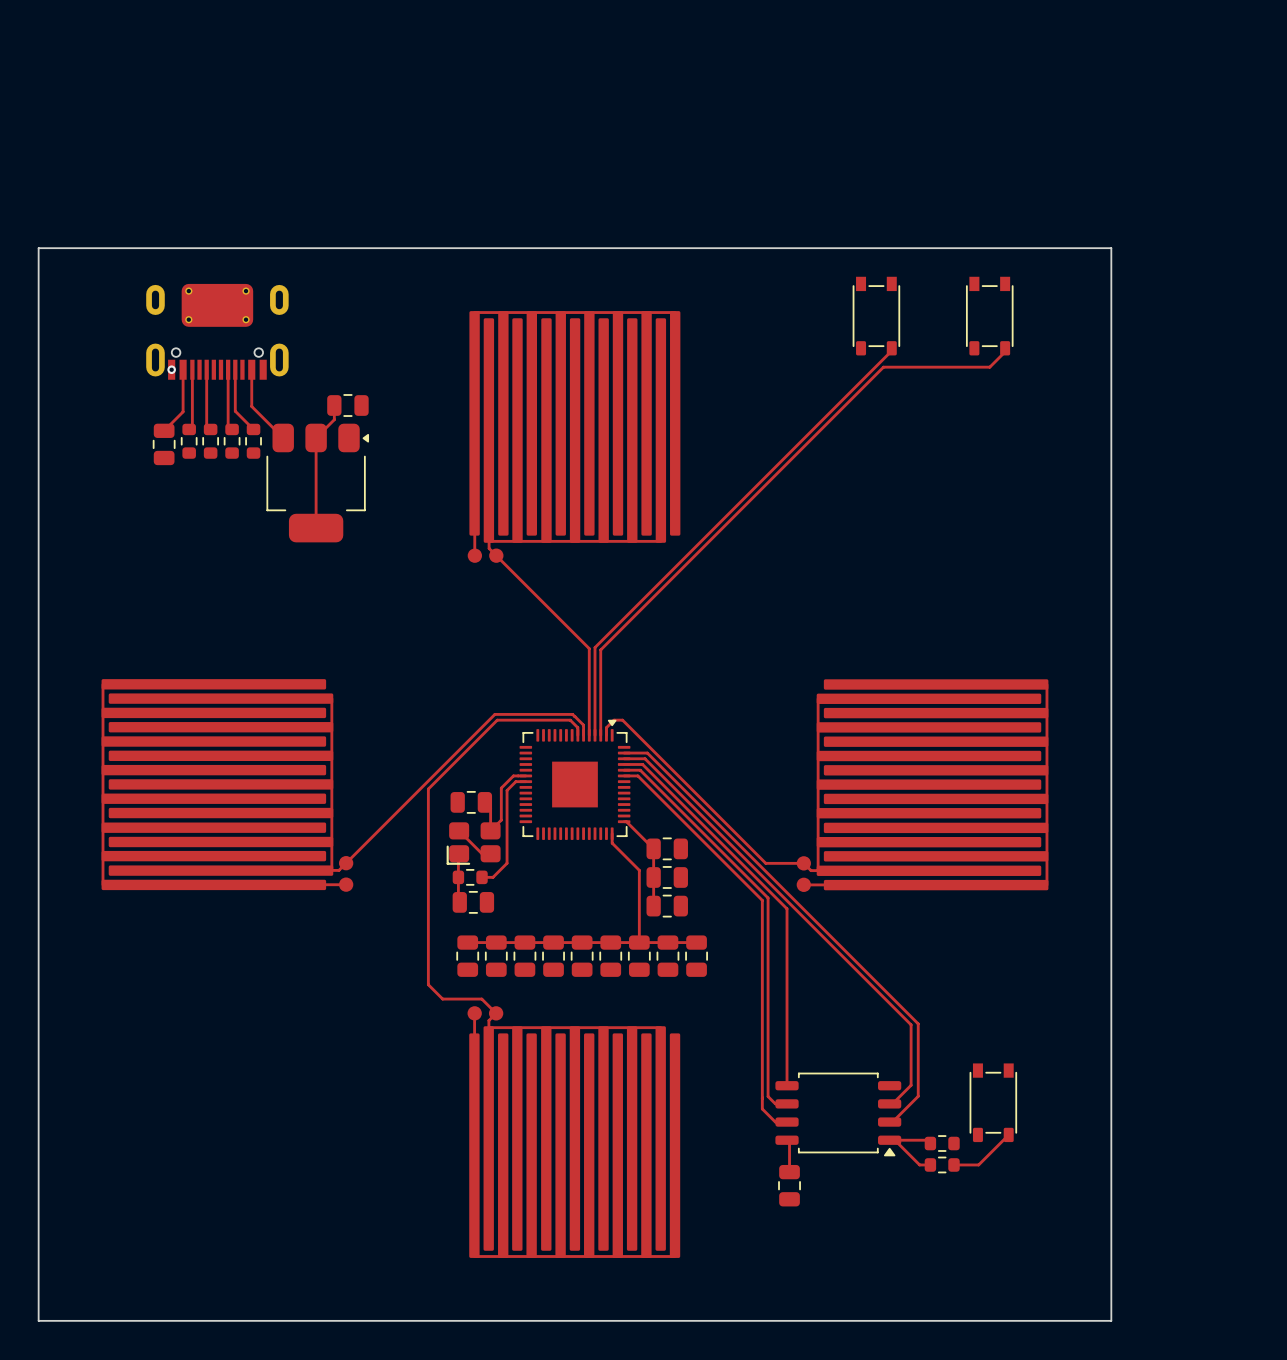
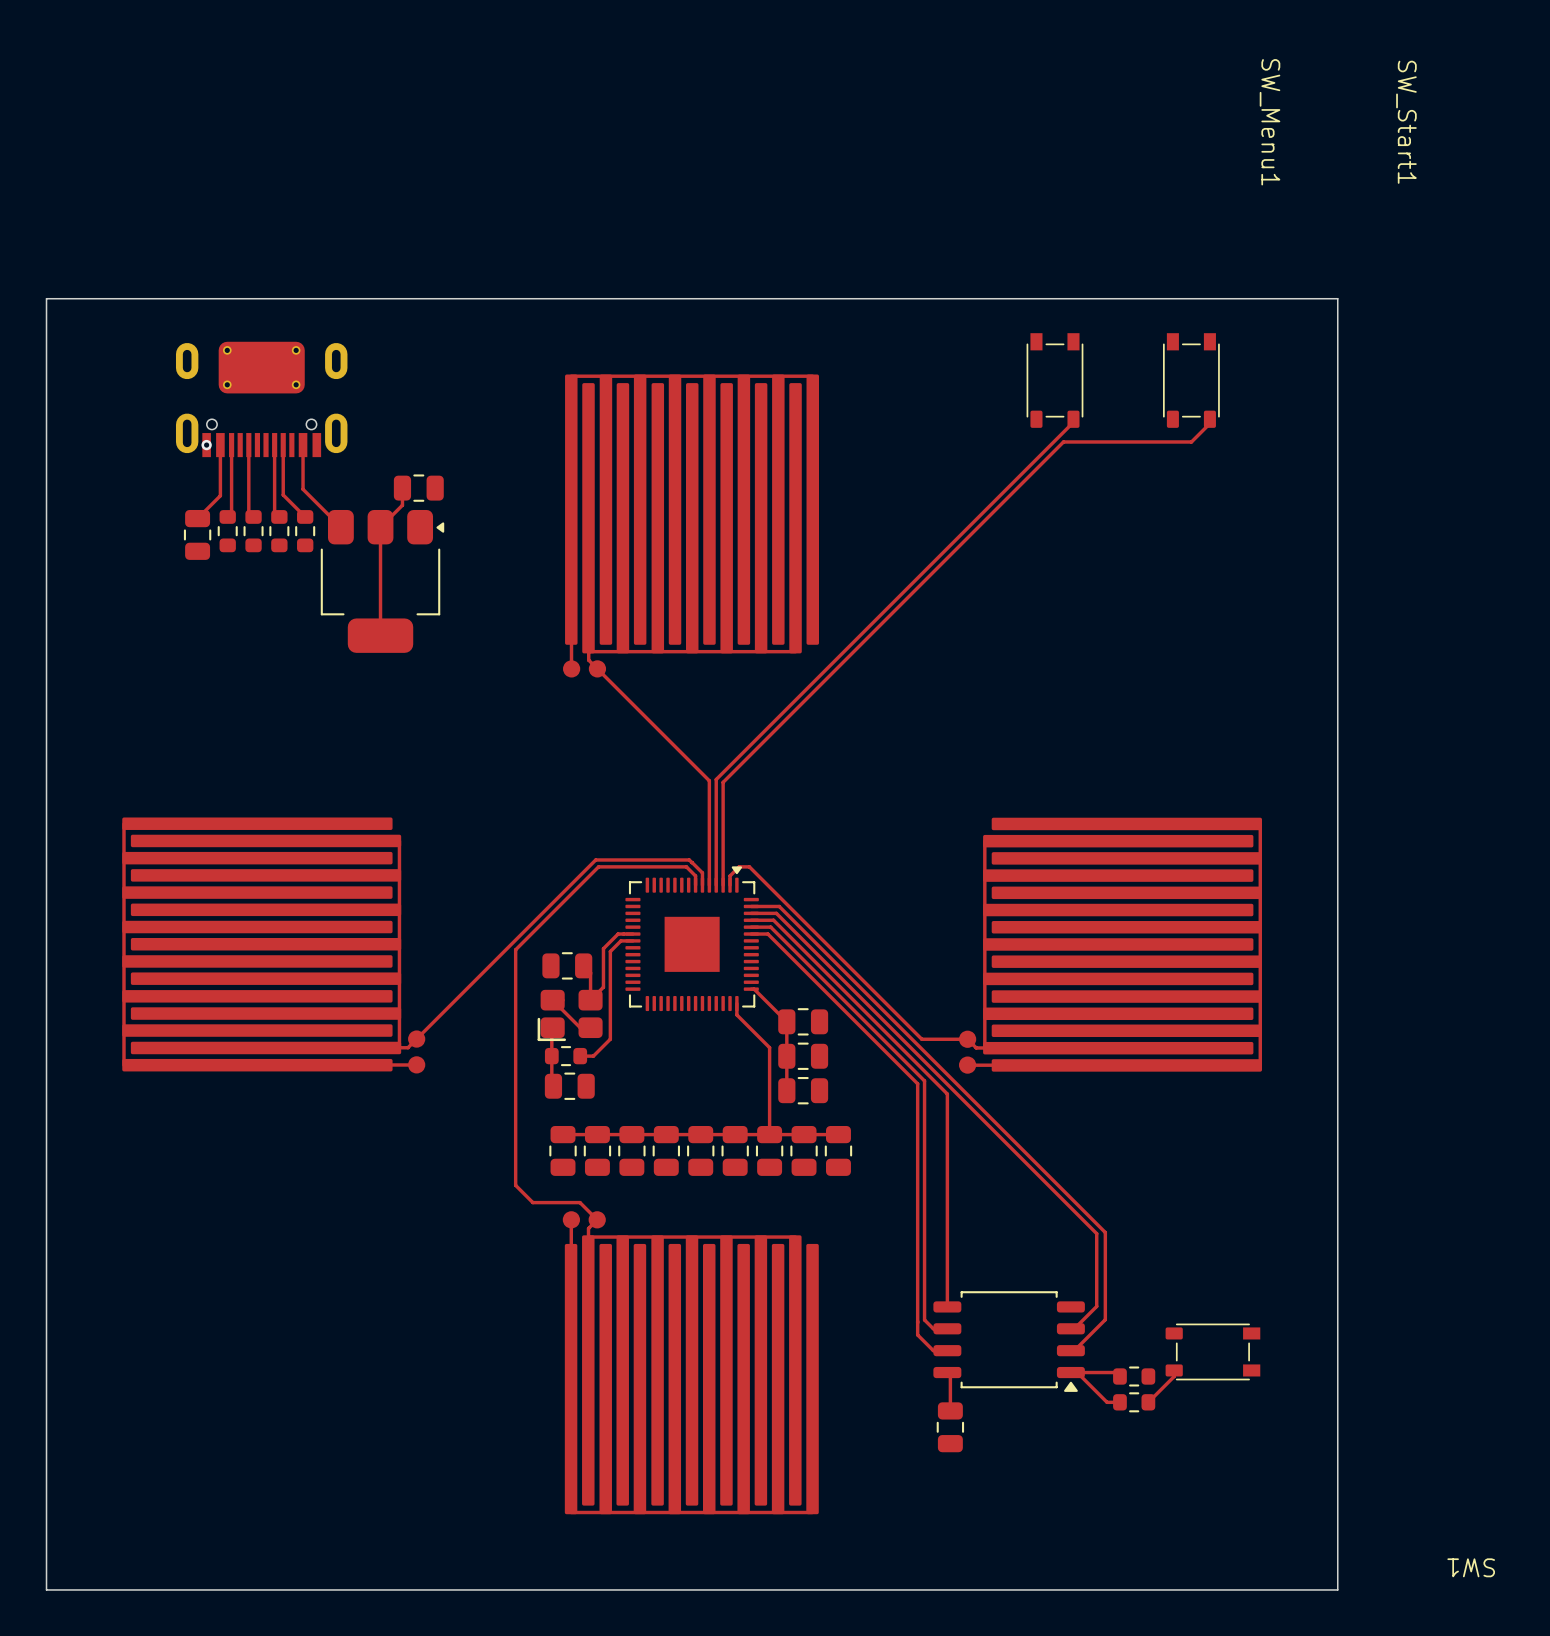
SW_Menu1 name: none -> SW_Menu1 (1270, 122)
SW_Start1 name: none -> SW_Start1 (1406, 122)
part: (993, 1102) -> none
SW1: none -> (1212, 1351)
track: (1008, 1134) (978, 1164) (954, 1164) -> (1174, 1370) (1174, 1376) (1148, 1402)

